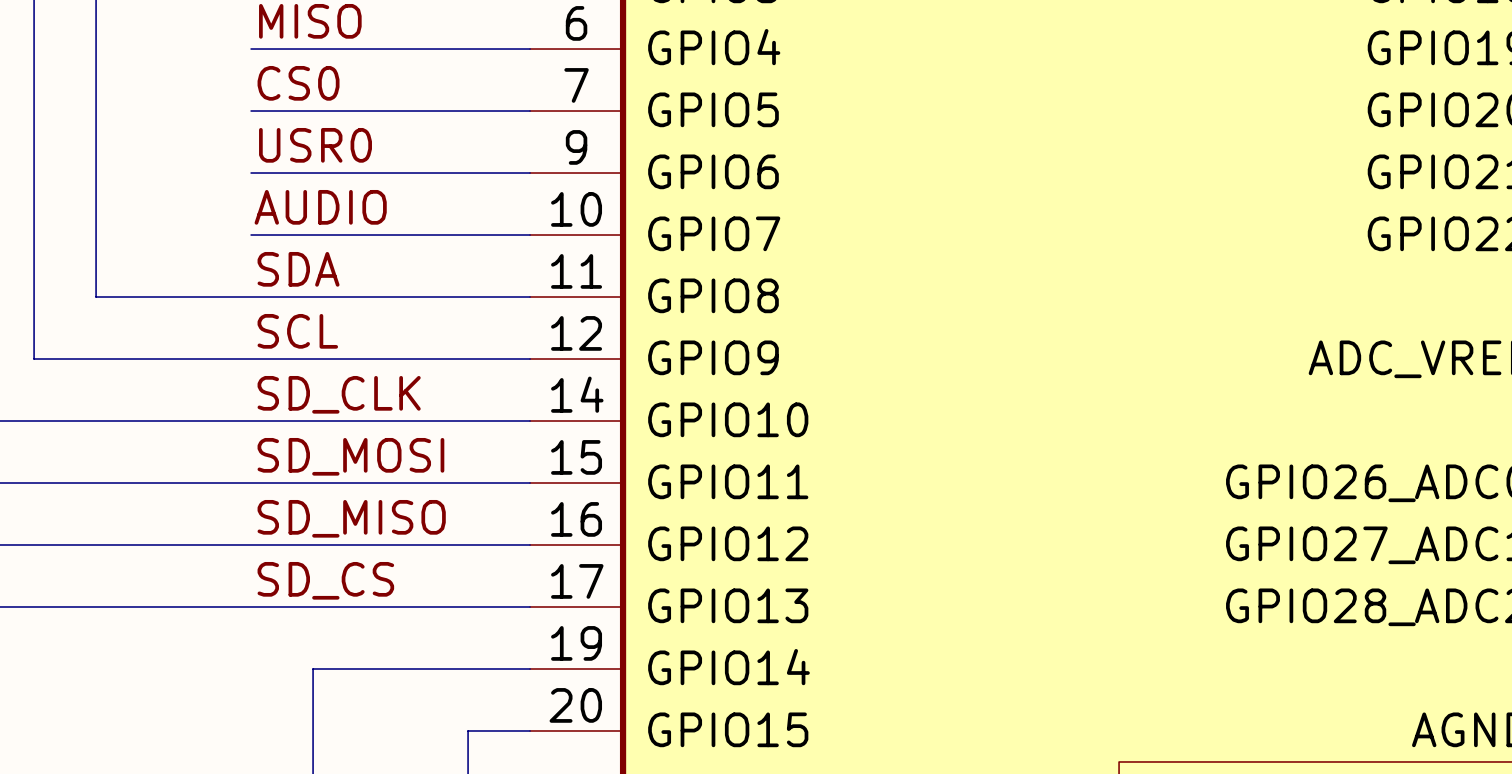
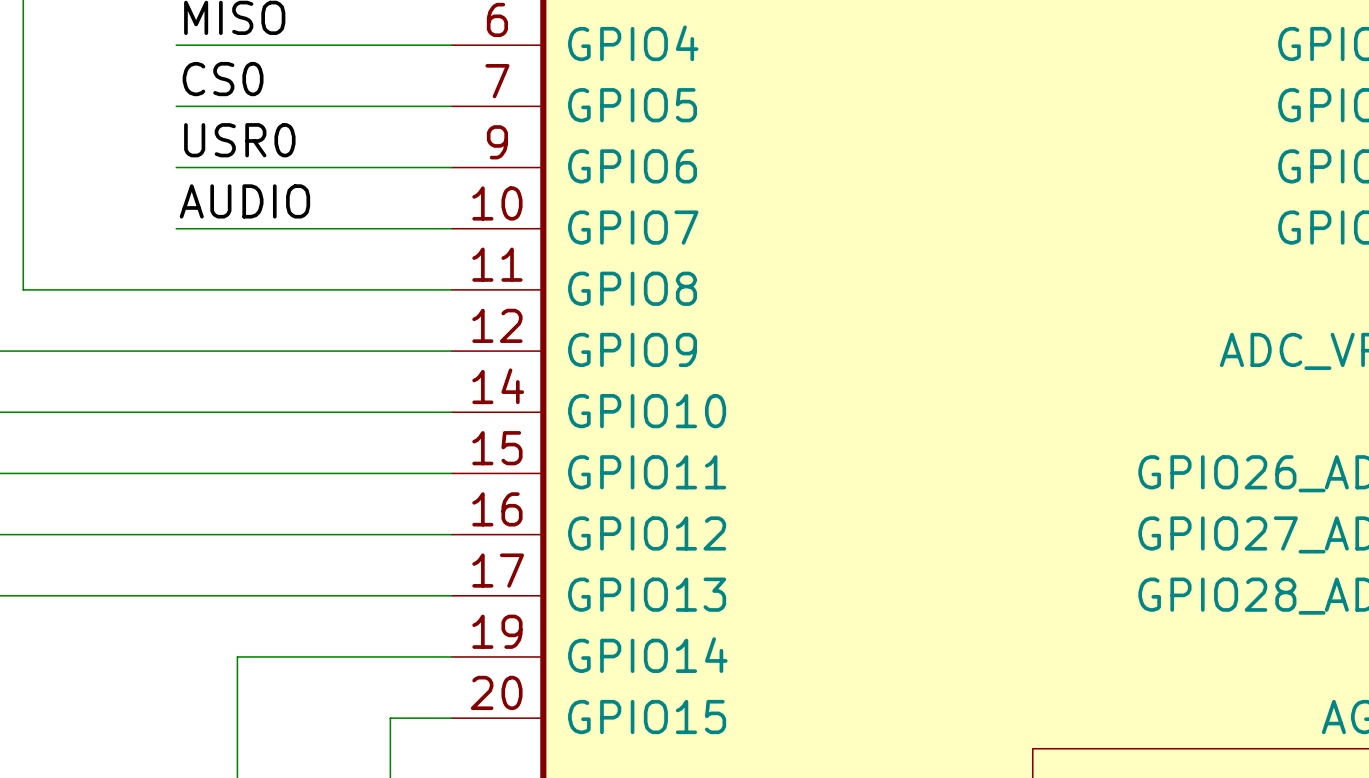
label: SDA (298, 269) -> none
label: SCL (297, 331) -> none
label: SD_CLK (339, 394) -> none
label: SD_MOSI (350, 456) -> none
label: SD_MISO (351, 518) -> none
label: SD_CS (325, 580) -> none

